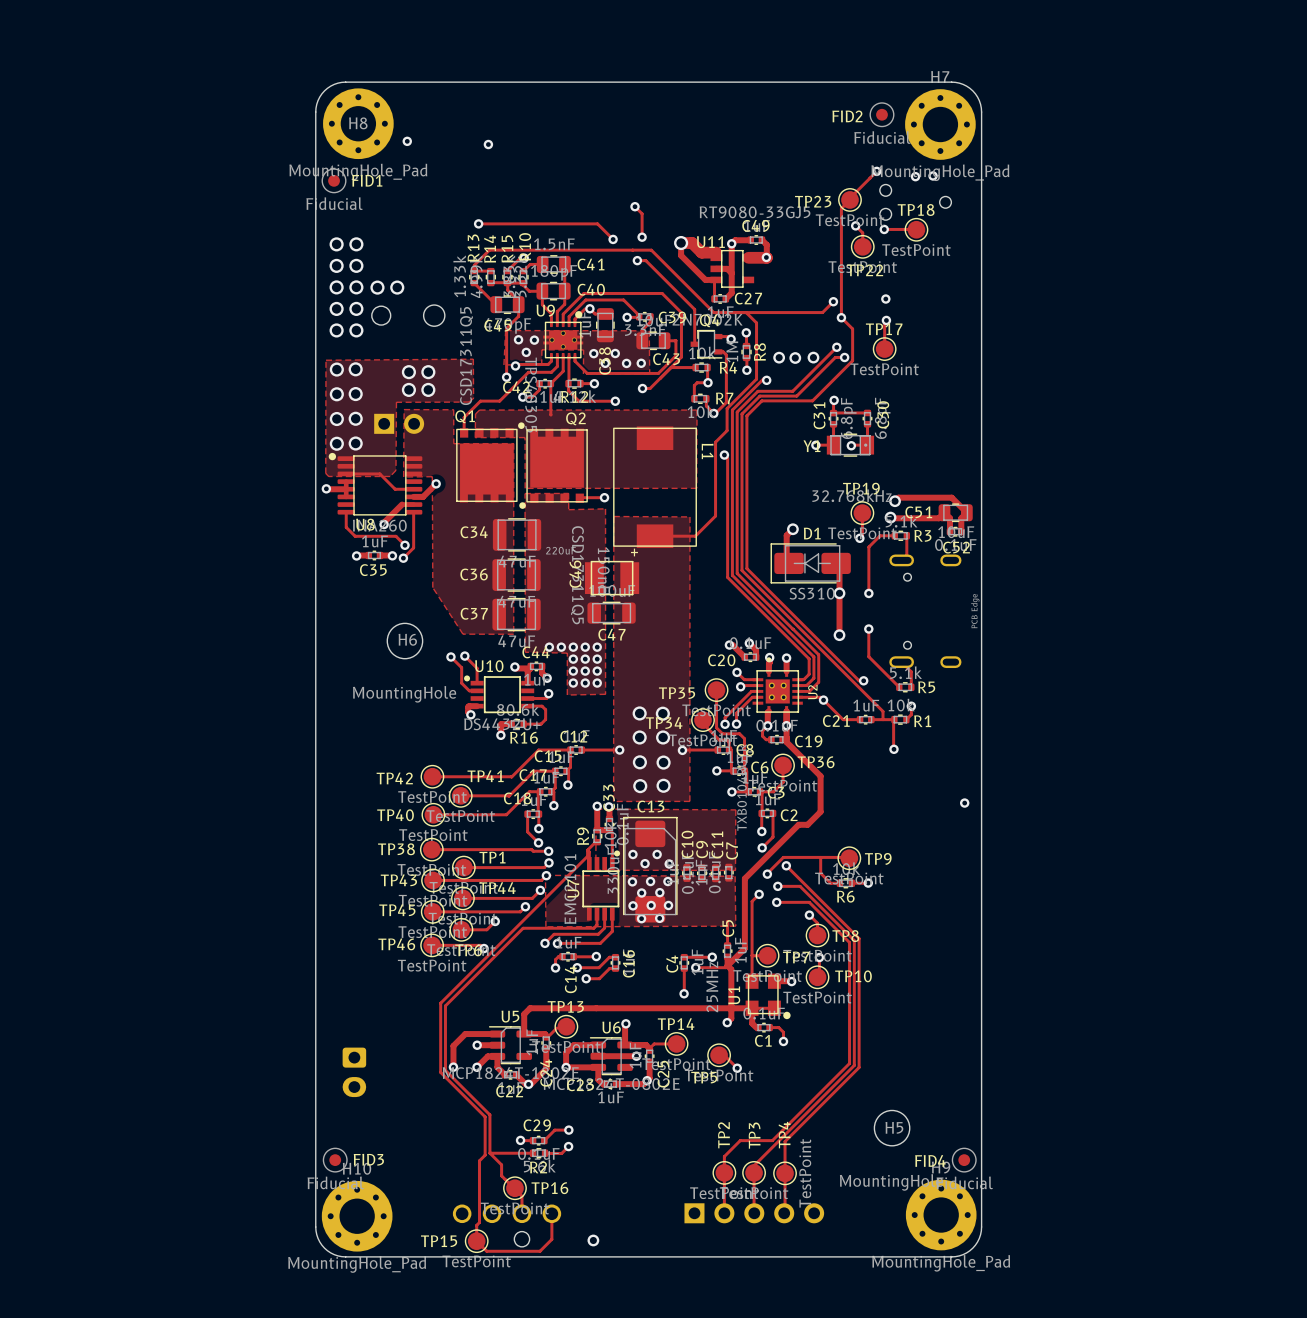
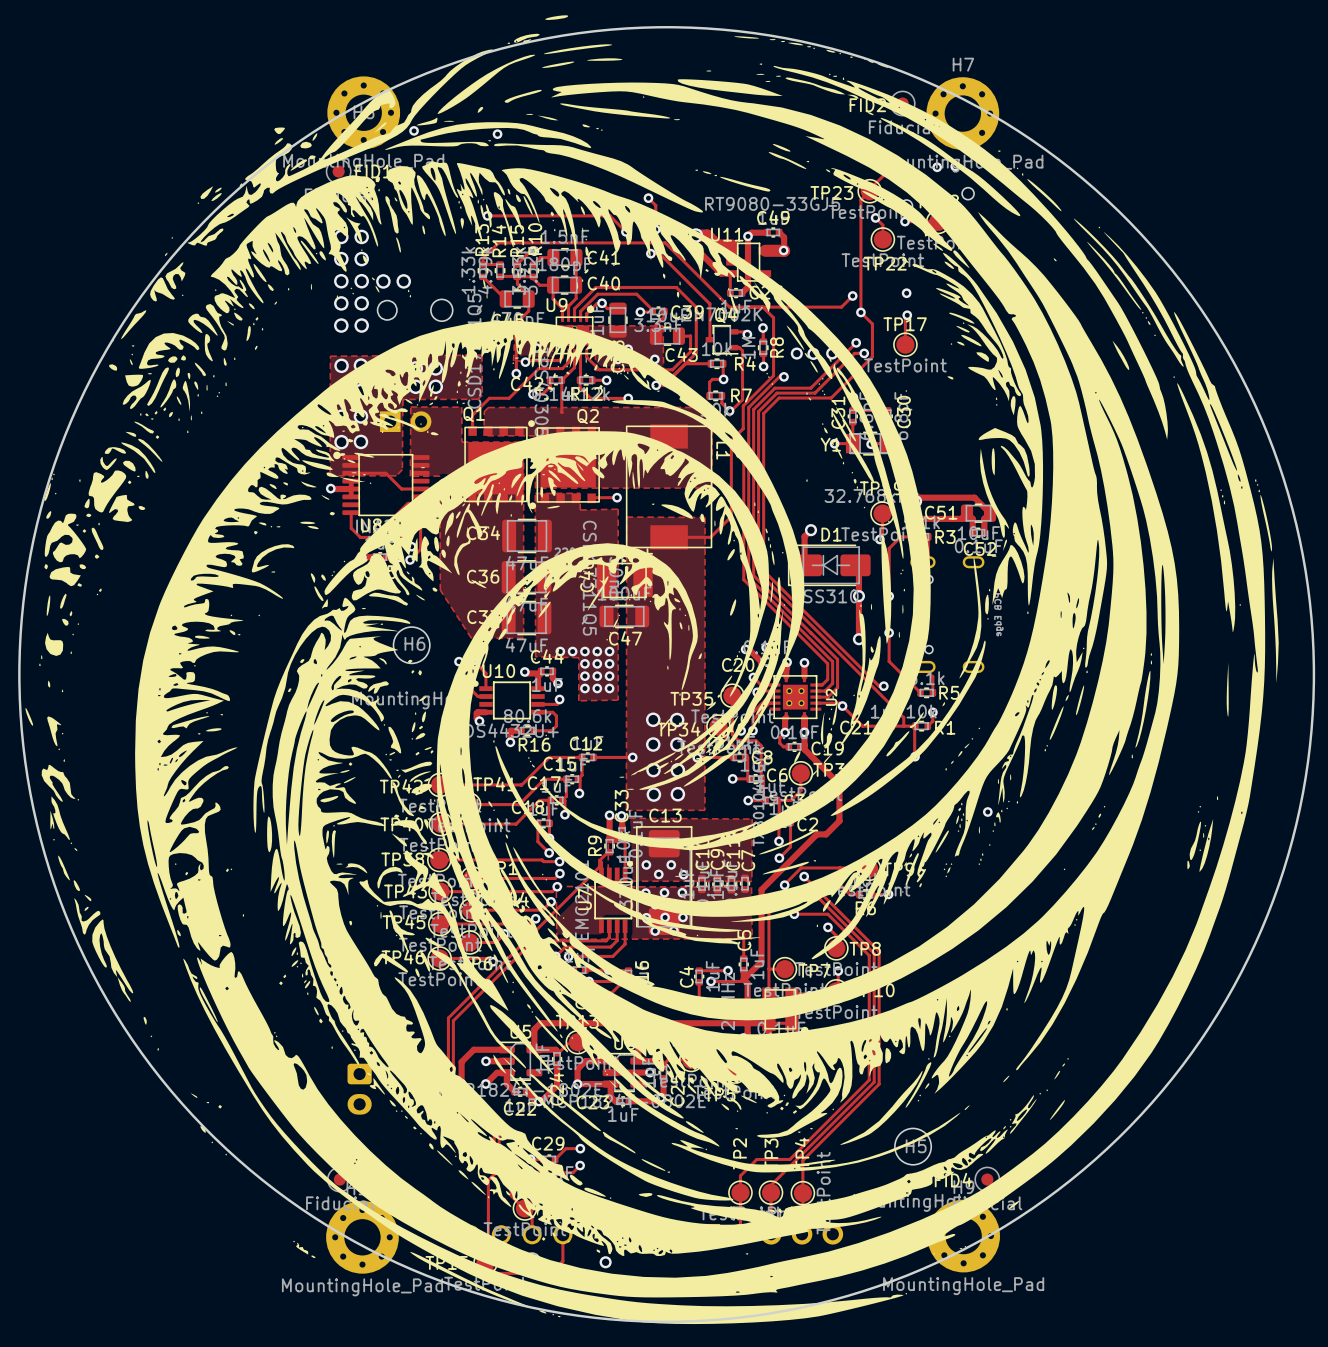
drawing: none -> [25, 15, 1279, 1325]
round board edge: none -> [18, 26, 1316, 1323]
board edge: (345, 82) (951, 82) (966, 86) (977, 97) (981, 112) (981, 1226) (977, 1241) (966, 1252) (951, 1256) (345, 1256) (330, 1252) (319, 1241) (315, 1226) (315, 112) (318, 100) (324, 90) (334, 84) (345, 82) -> none

